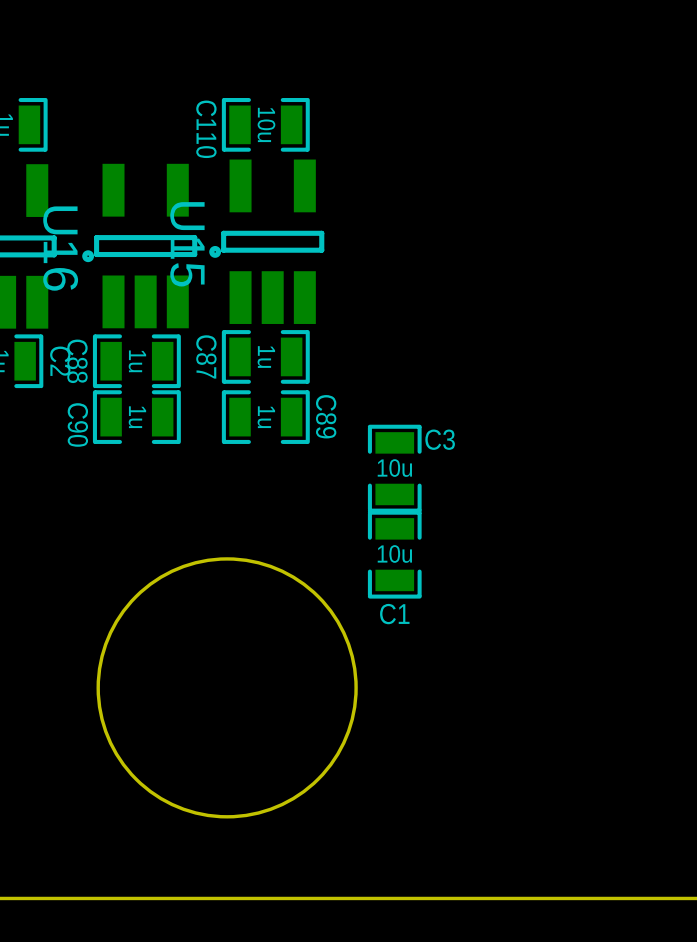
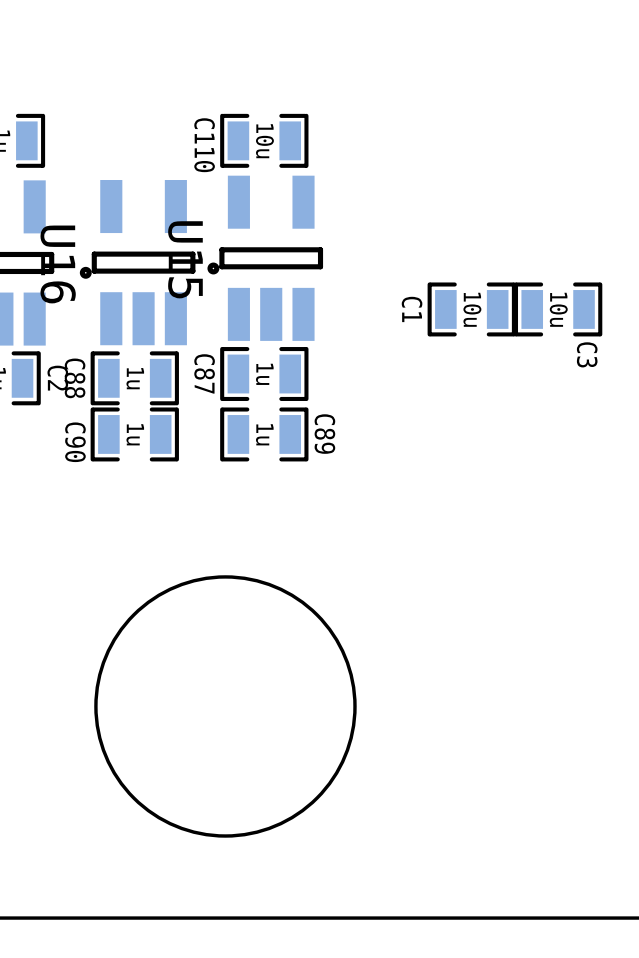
C3 rotation: 0° (394, 468) -> 90° clockwise (558, 309)
C3 position: (394, 468) -> (558, 309)
C1 rotation: 0° (394, 554) -> 90° clockwise (471, 309)
C1 position: (394, 554) -> (471, 309)

